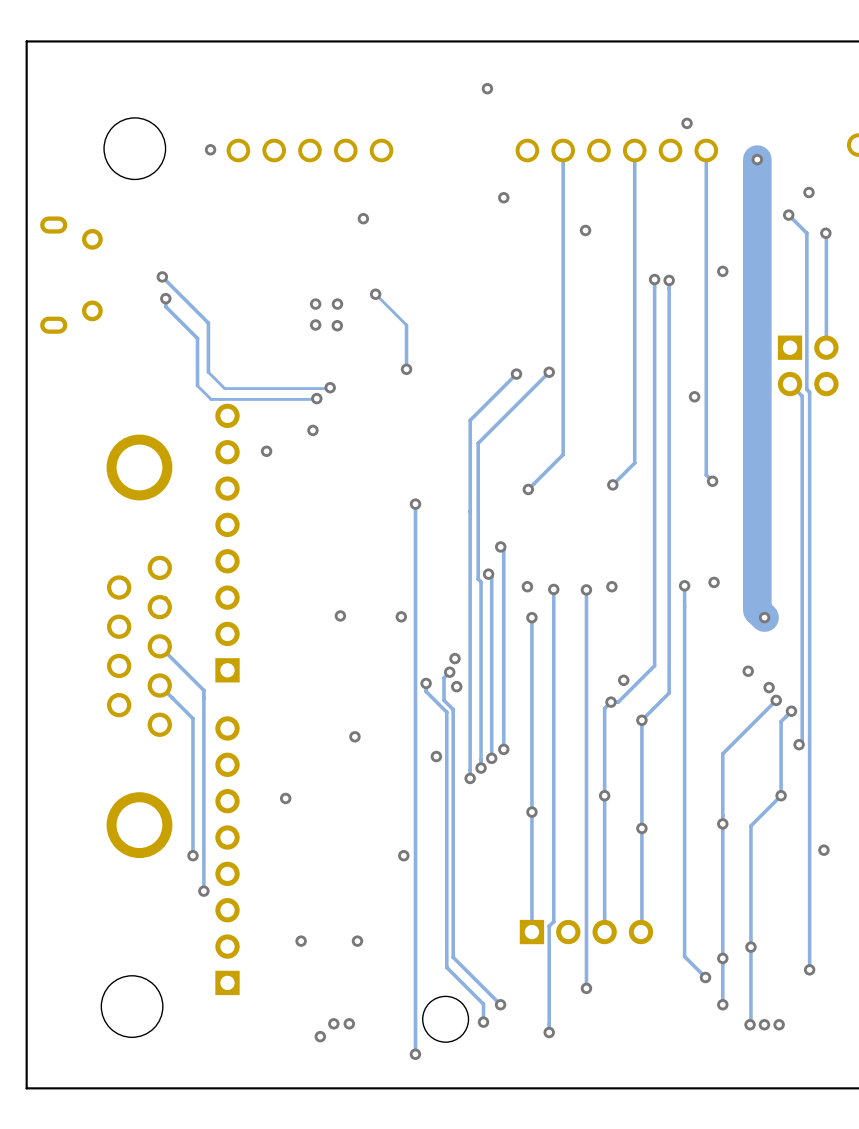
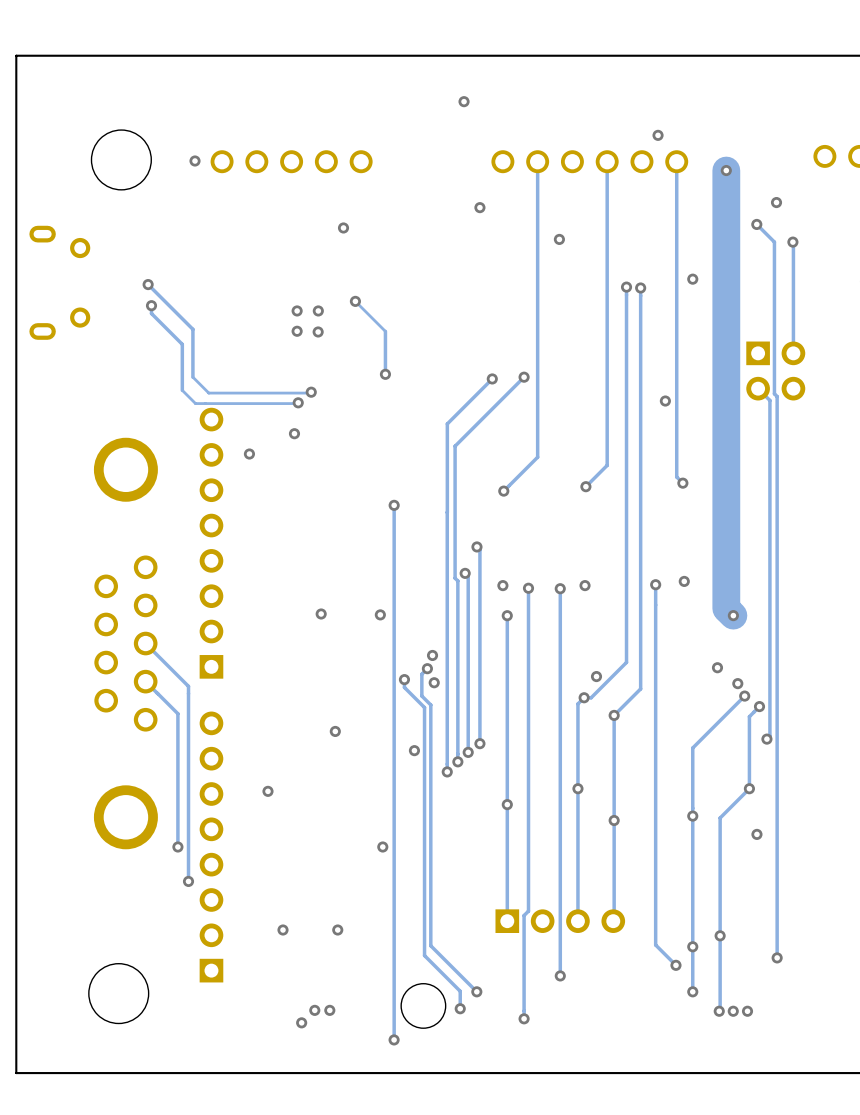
via position: (823, 850) -> (756, 834)

